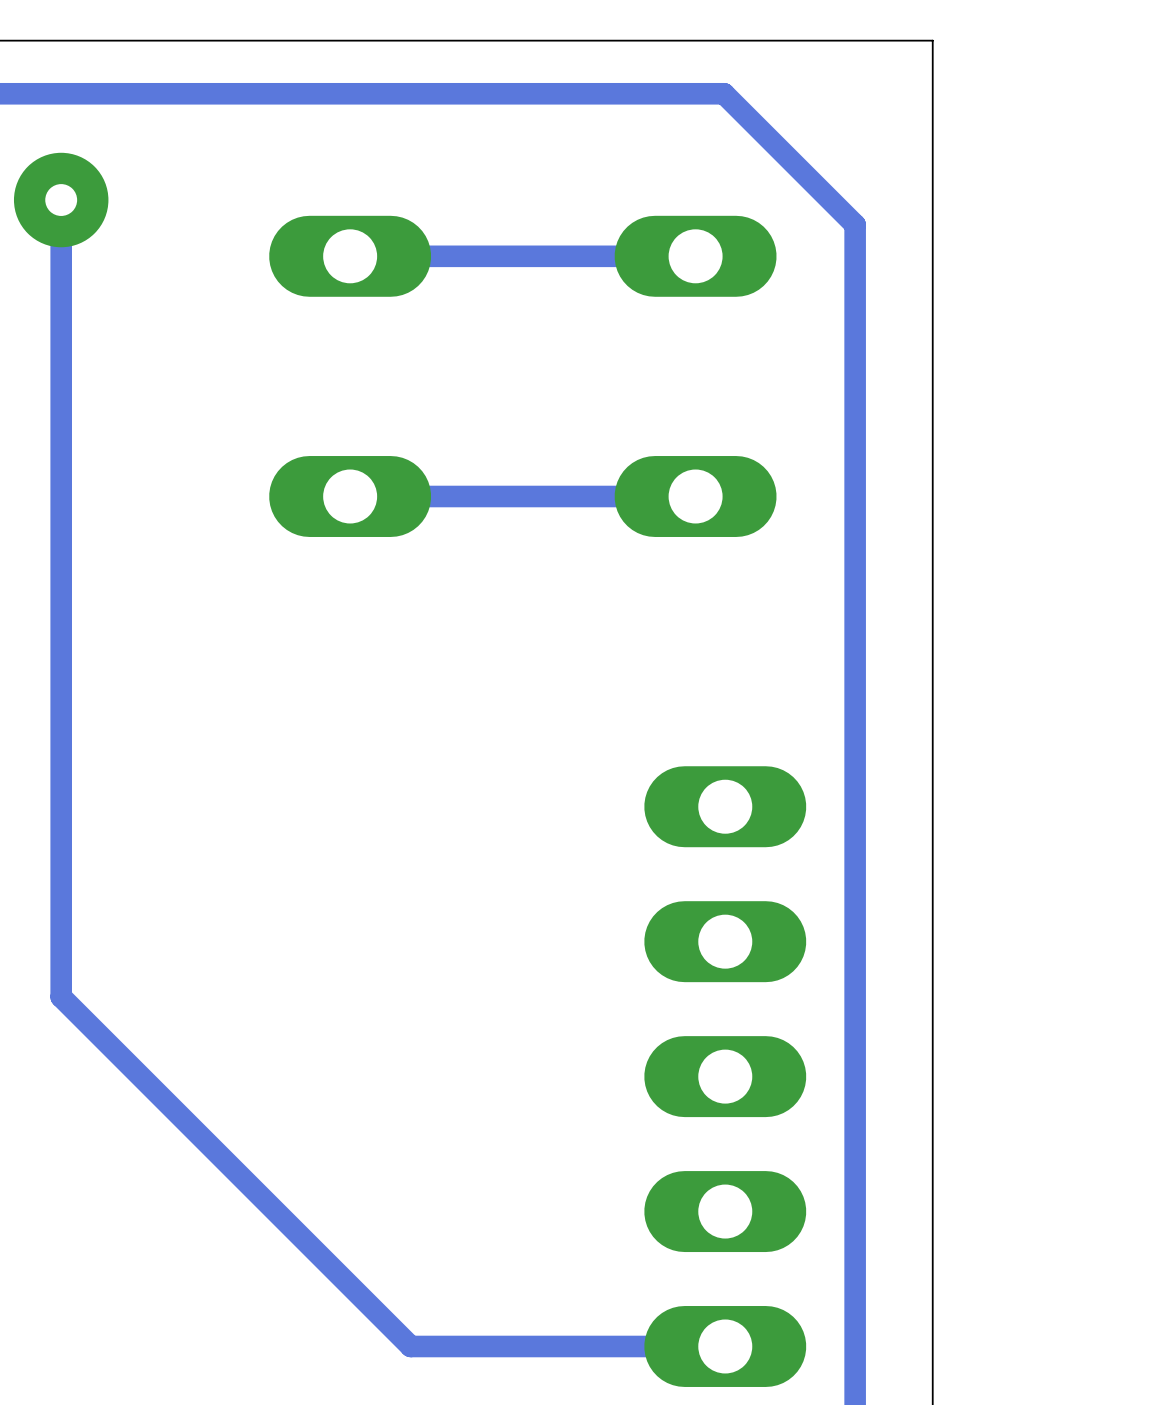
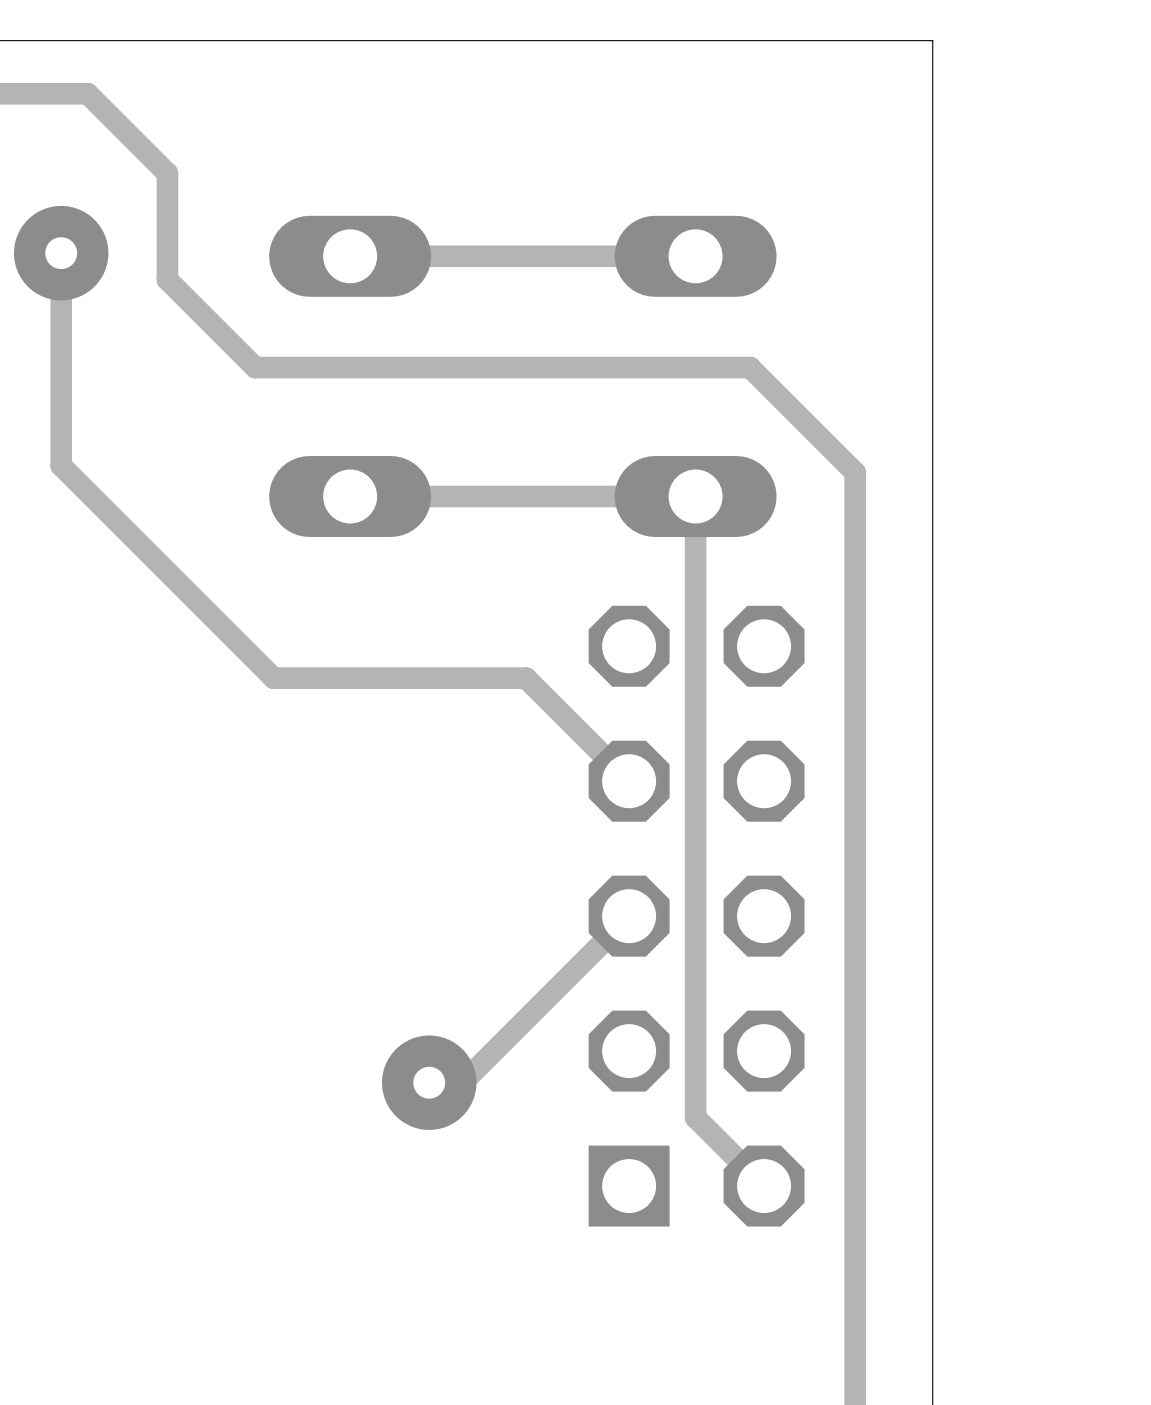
track: (87, 93) (724, 93) (855, 224) (855, 472) -> (87, 93) (167, 173) (167, 279) (255, 367) (750, 367) (855, 472)
via position: (61, 200) -> (61, 253)
track: (61, 465) (61, 996) (410, 1346) (725, 1346) -> (61, 465) (273, 678) (526, 678) (629, 781)
track: none -> (695, 496) (695, 1117) (764, 1186)
track: none -> (629, 916) (462, 1082) (429, 1082)
part: none -> (696, 916)
part: (725, 1076) -> none
via: none -> (429, 1082)

